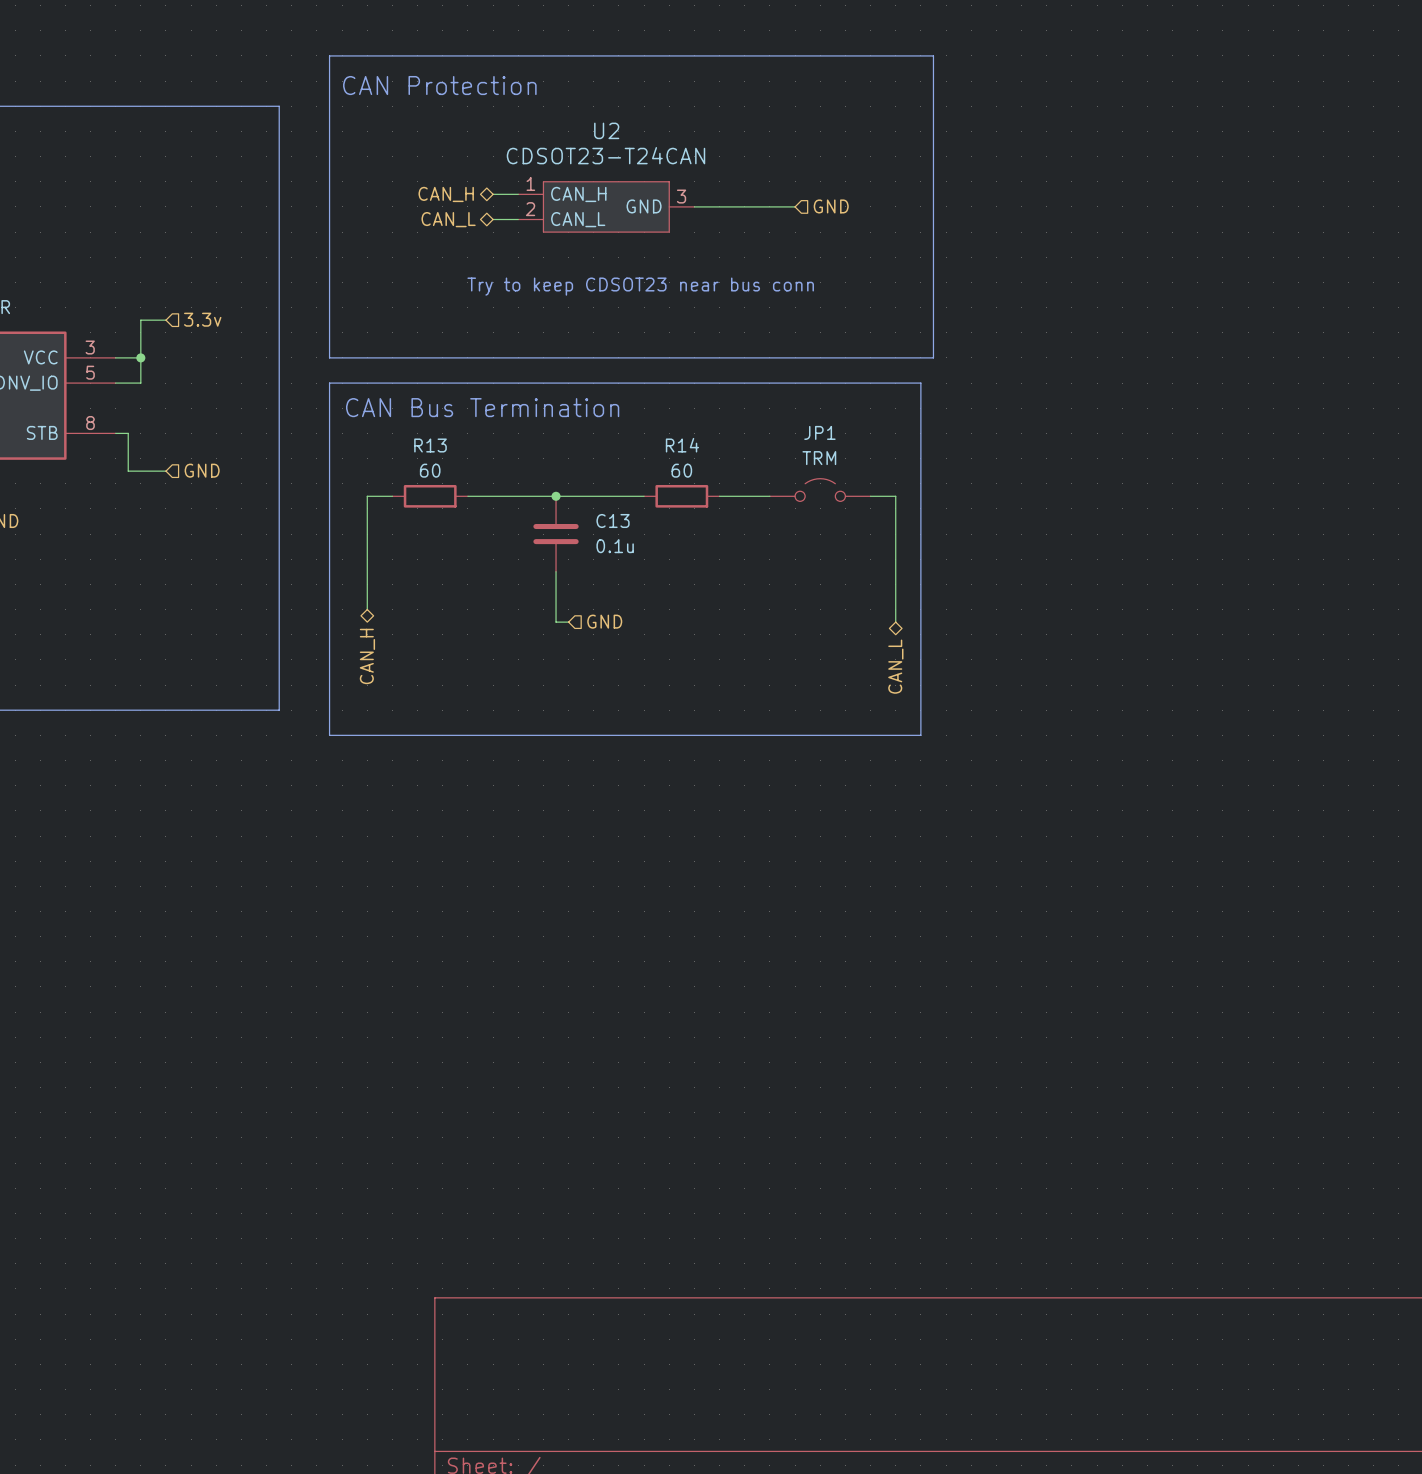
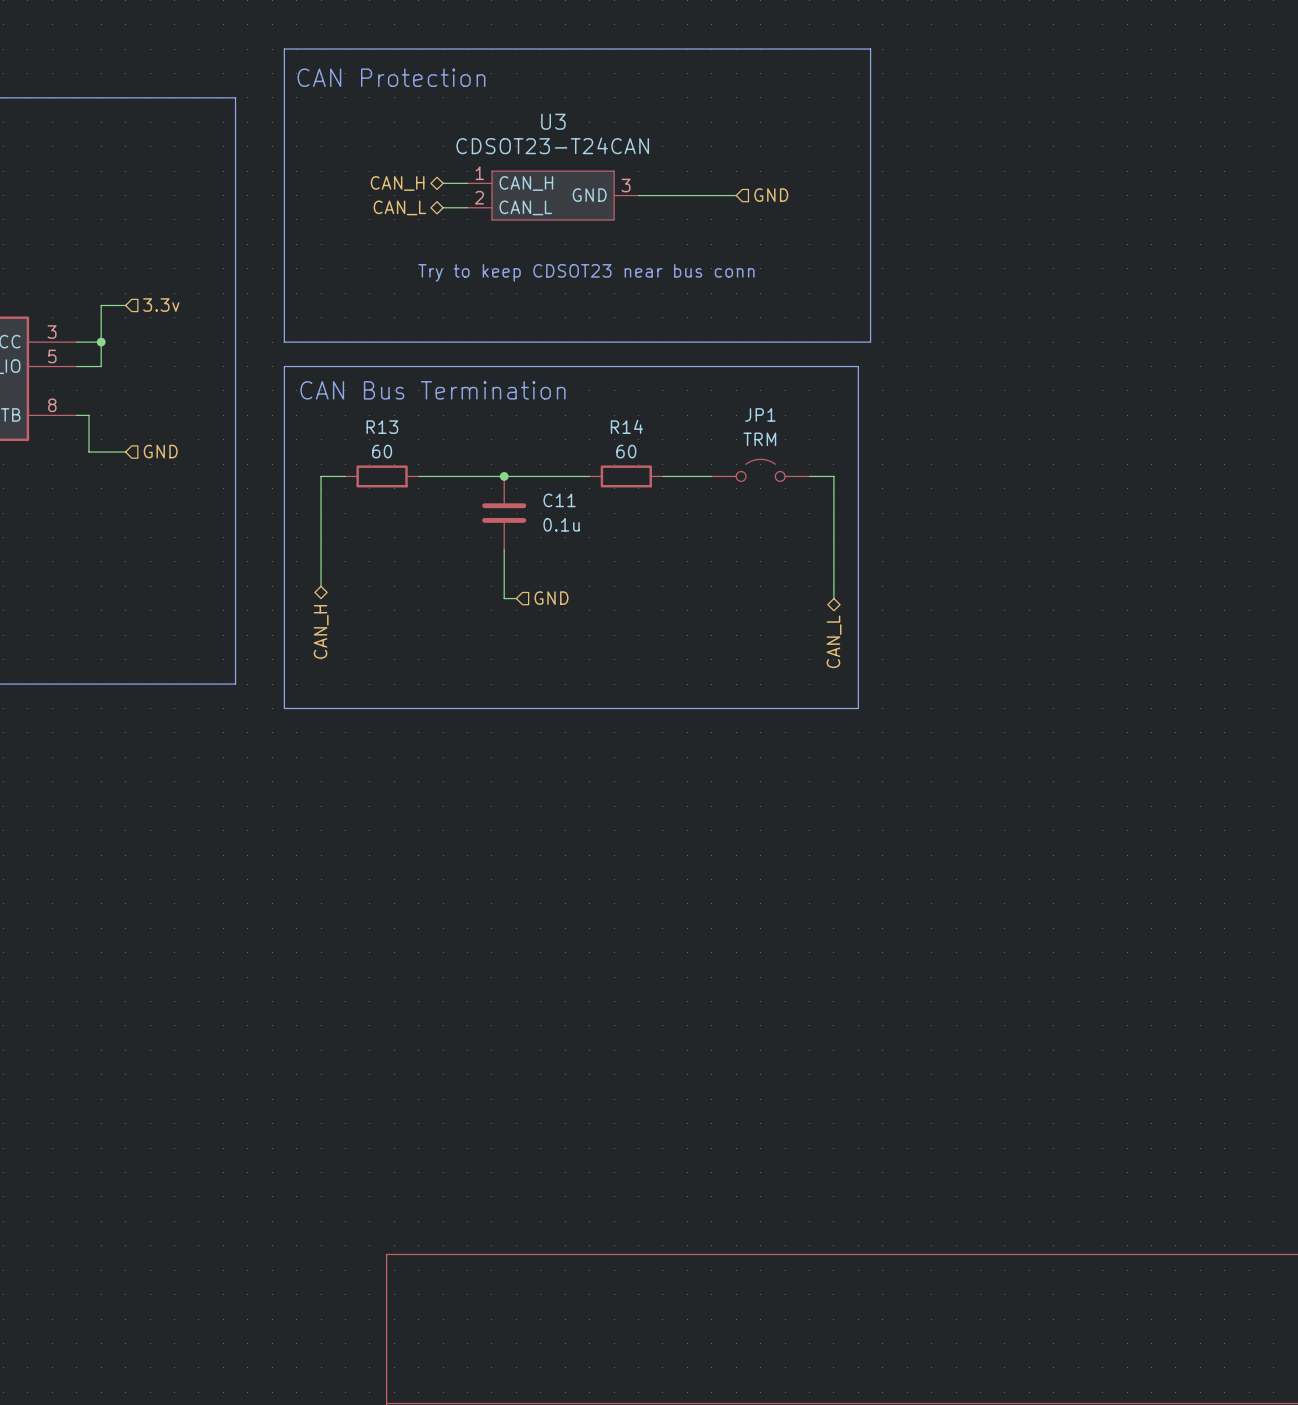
U2 name: U2 (606, 130) -> U3 (553, 121)
C13 name: C13 (613, 520) -> C11 (559, 500)

